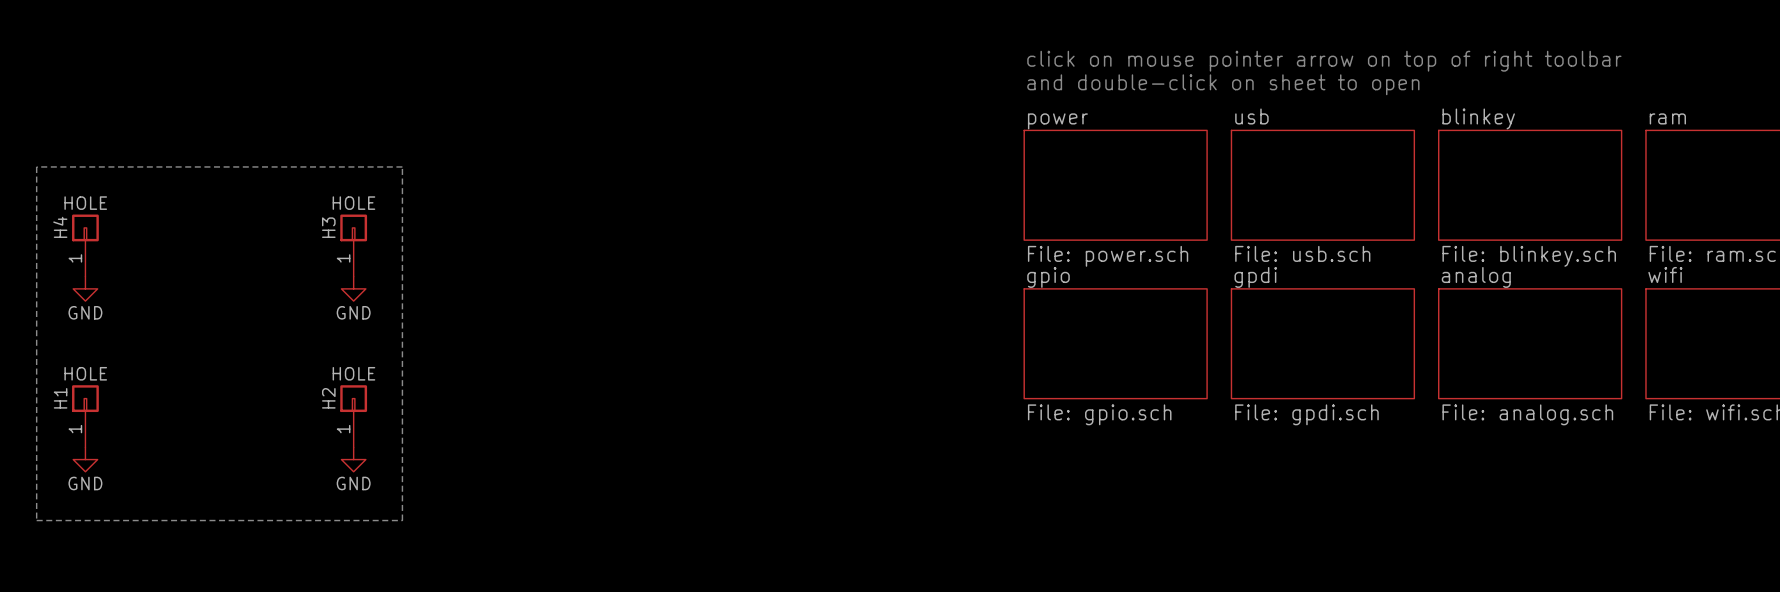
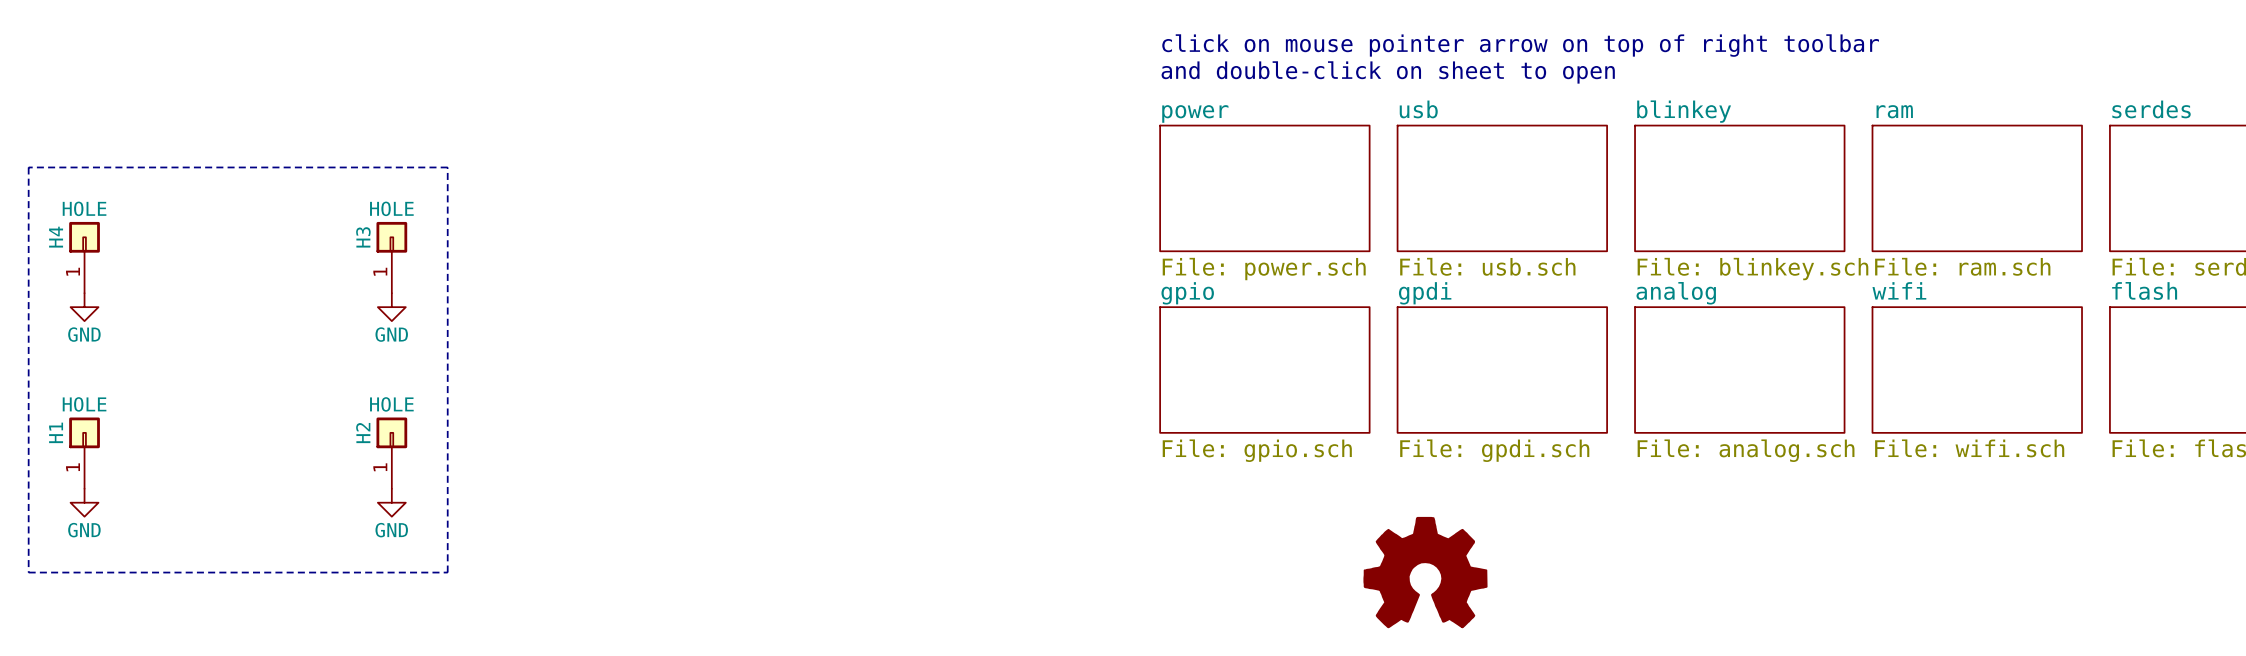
power symbol: none -> (1425, 572)

